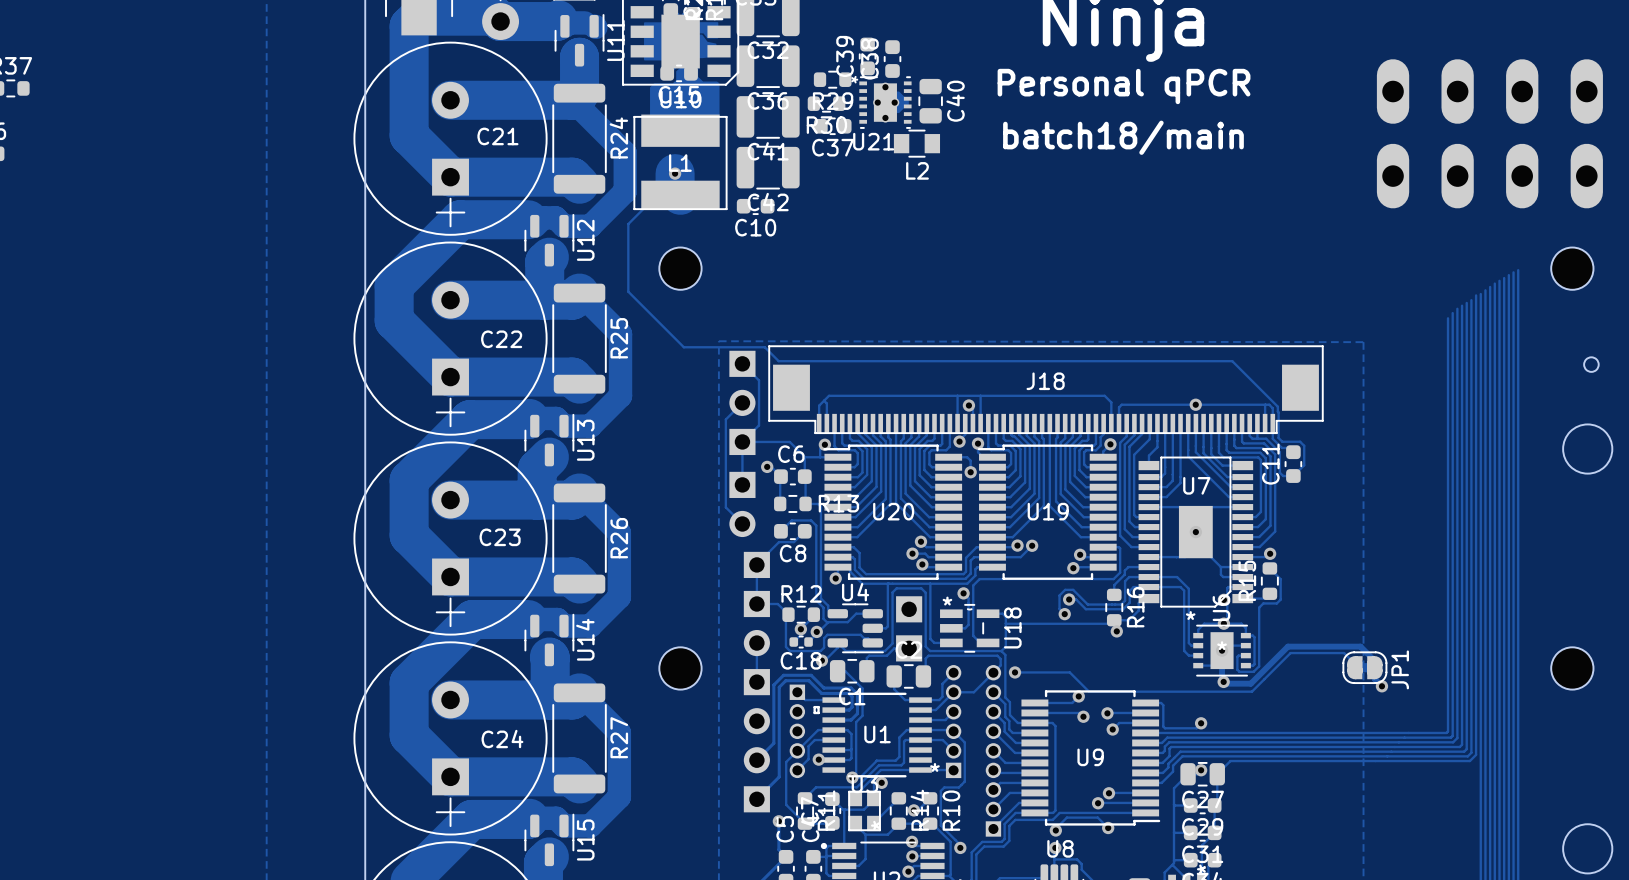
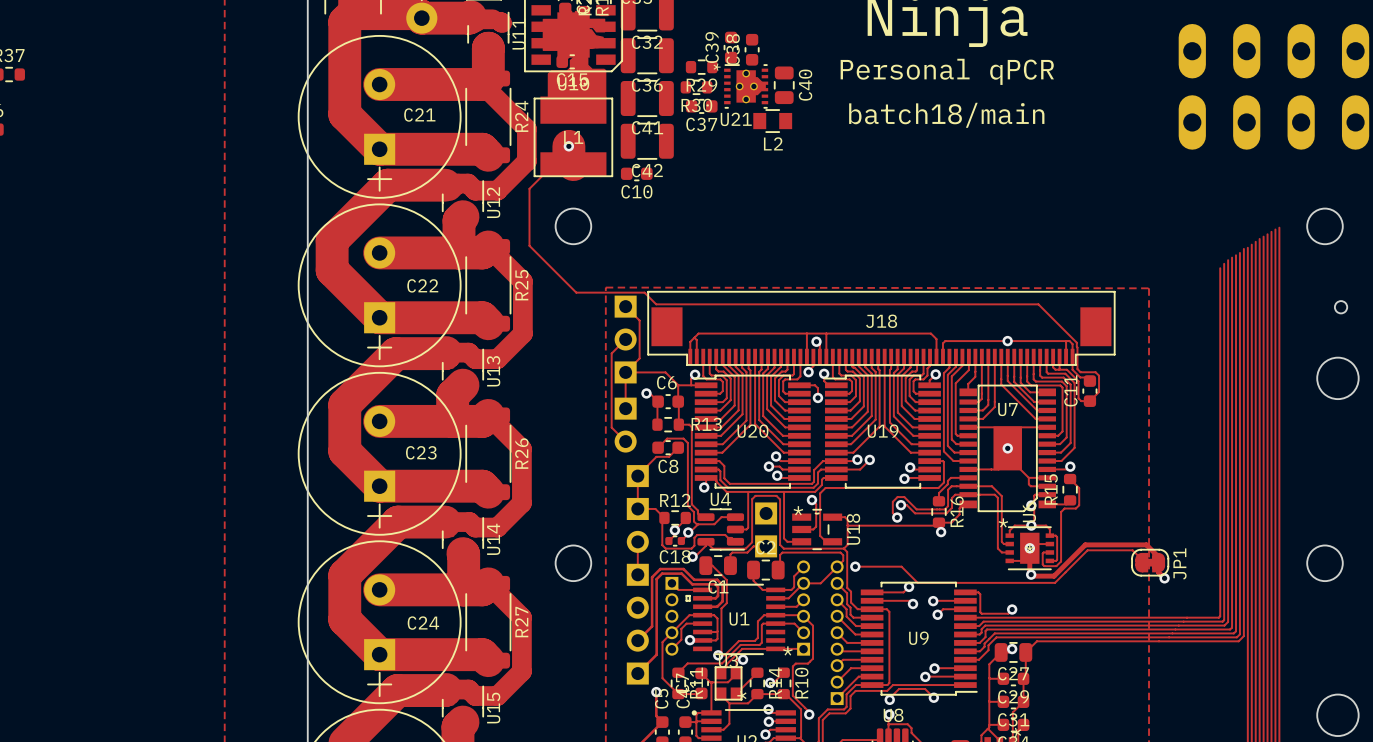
part position: (1489, 133) -> (1273, 86)

